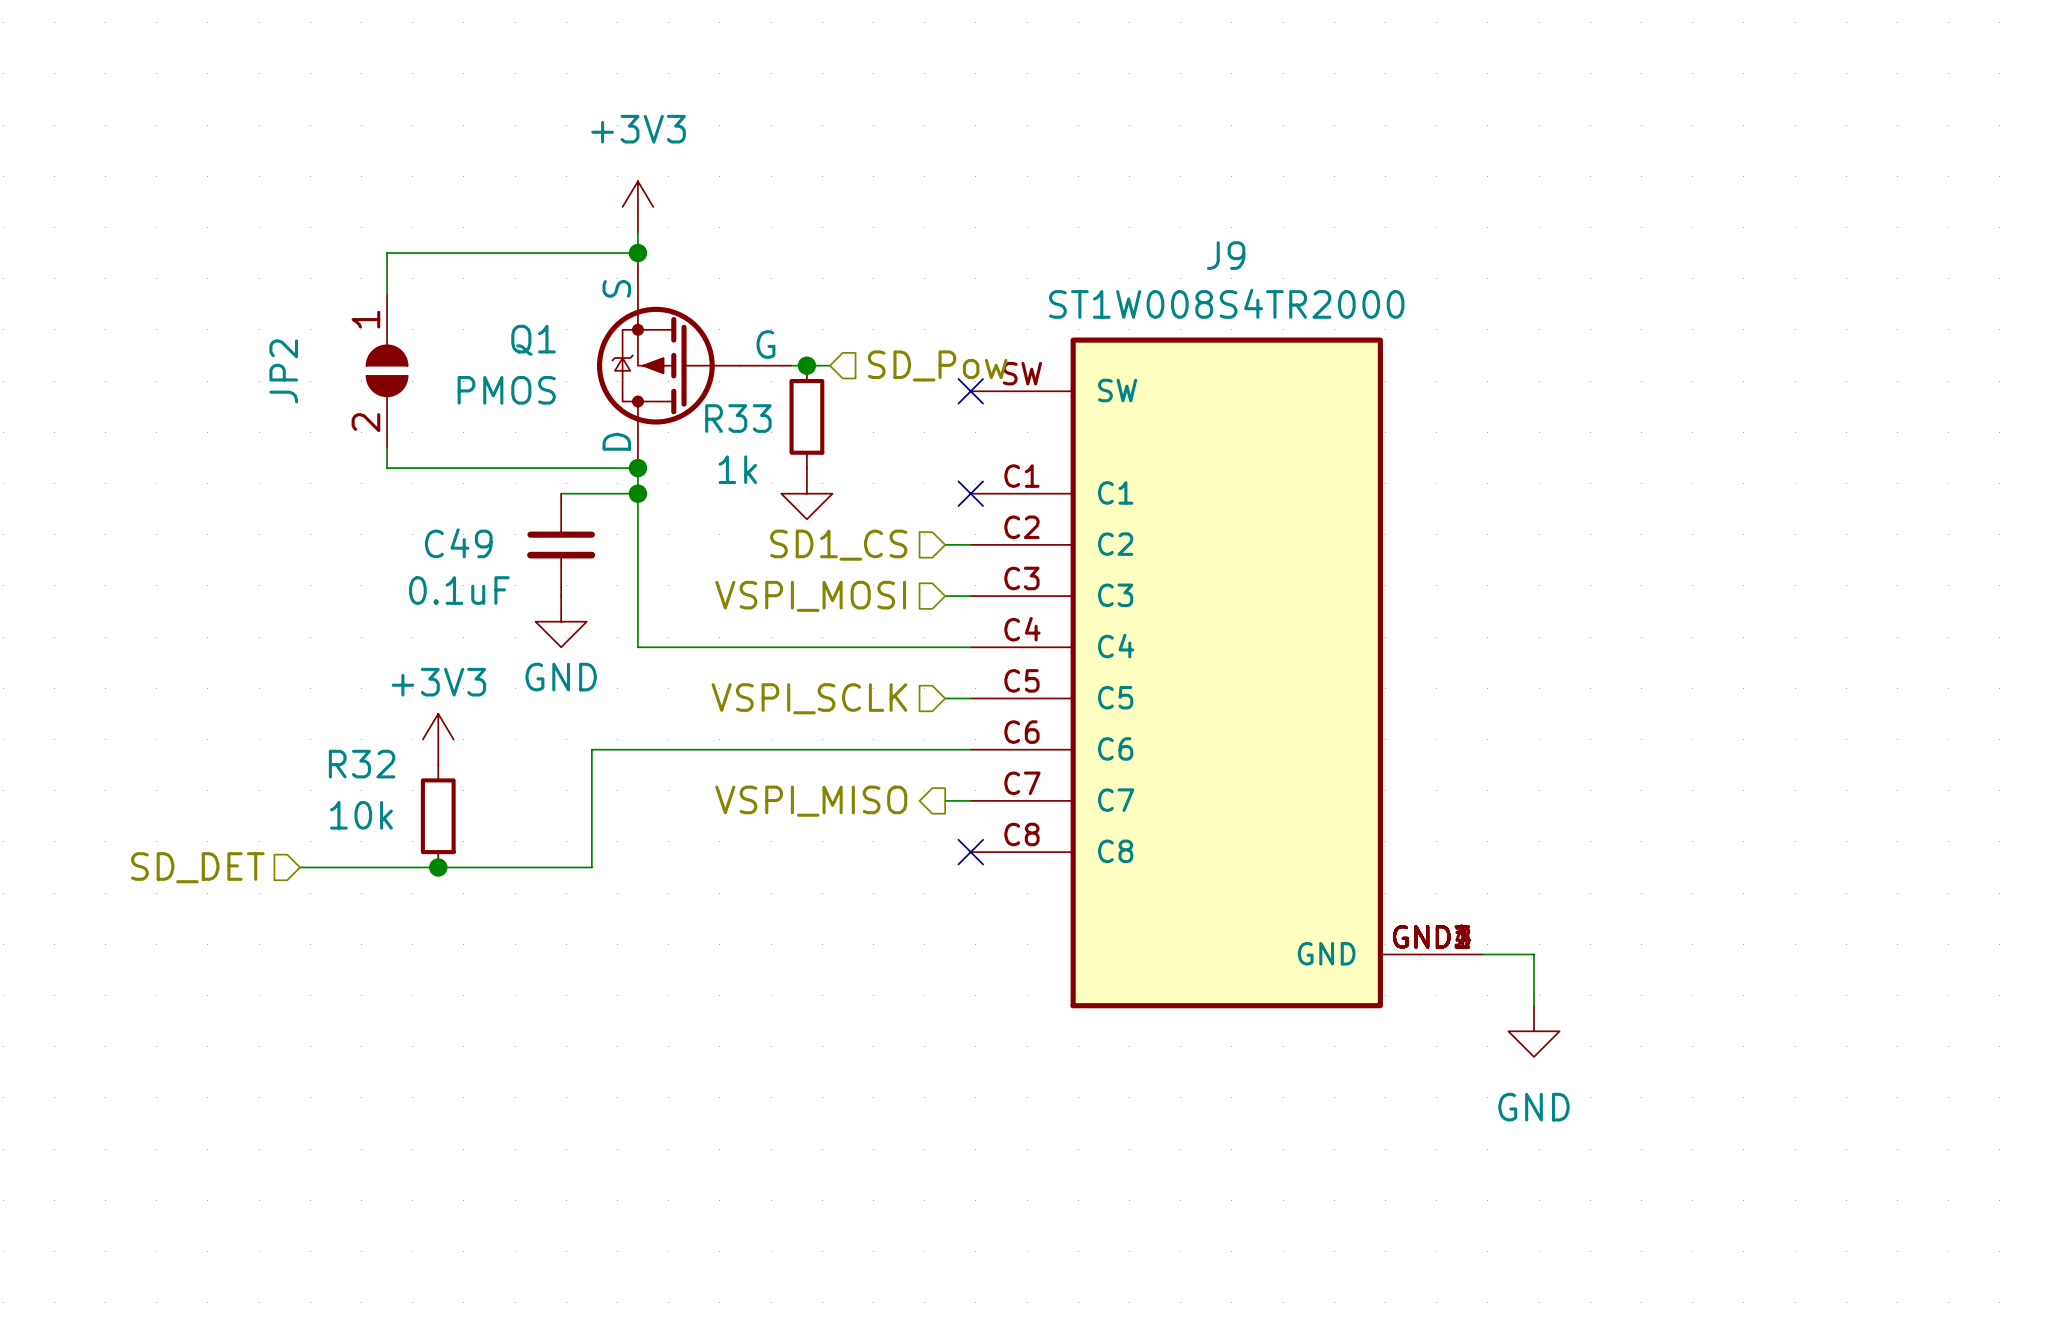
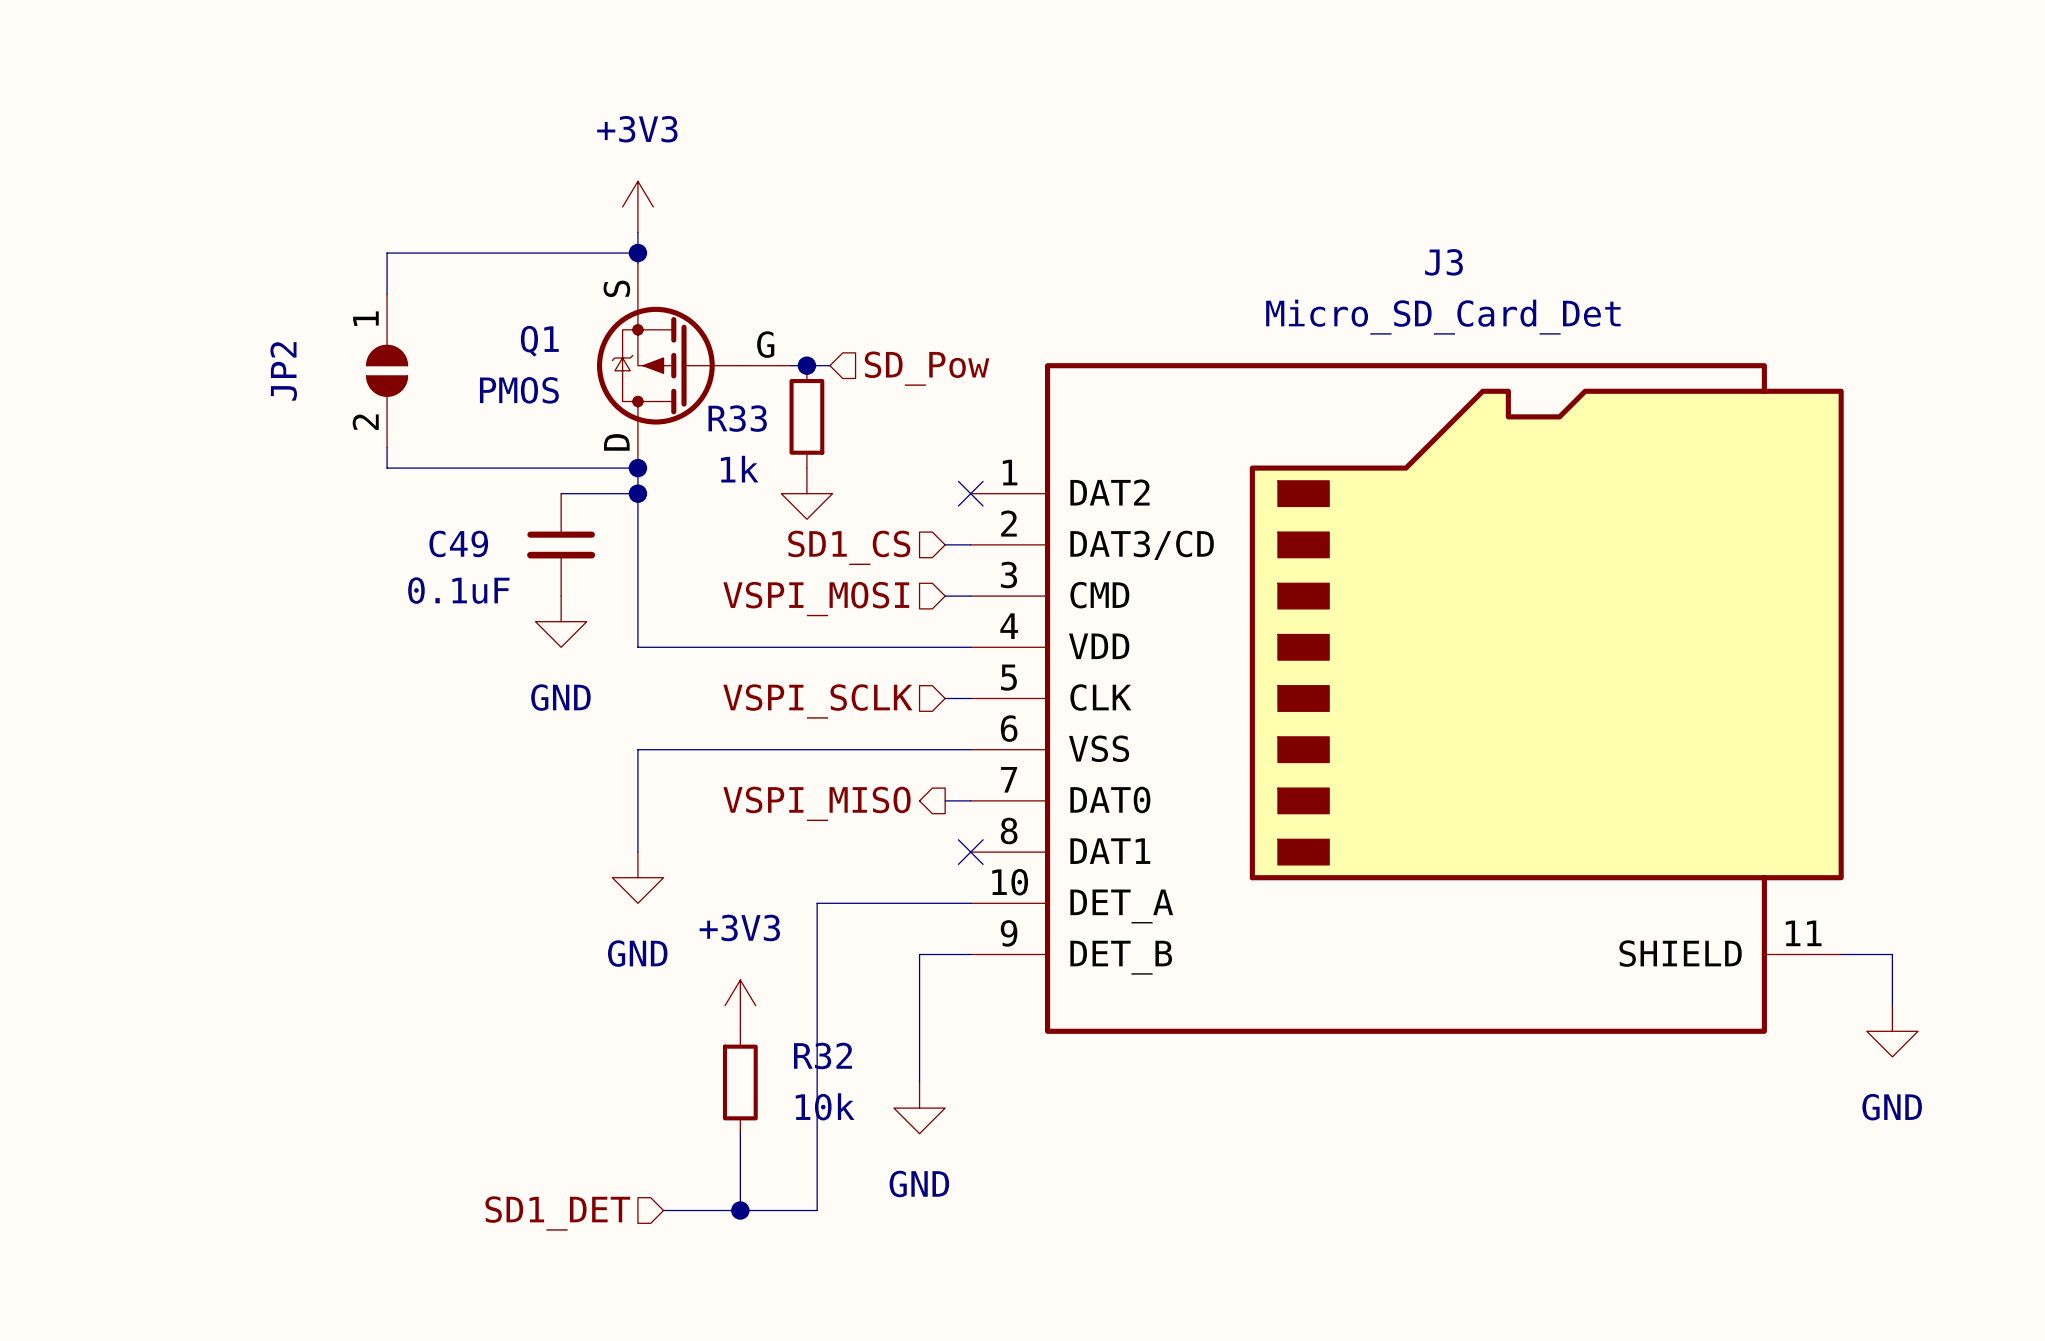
no-connect mark: (970, 391) -> none
J9: ST1W008S4TR2000 (1226, 672) -> none
power symbol text position: GND (561, 677) -> GND (560, 697)
power symbol text position: +3V3 (438, 682) -> +3V3 (739, 927)
J3: none -> Micro_SD_Card_Det (1407, 698)
power symbol position: +3V3 (438, 739) -> +3V3 (740, 1005)
wire: (637, 749) (591, 749) (591, 867) (300, 867) -> (637, 749) (637, 852)
R32 name position: R32 (362, 764) -> R32 (822, 1055)
R32 value position: 10k (361, 815) -> 10k (825, 1106)
R32 position: (438, 816) -> (740, 1082)
hierarchical label: SD_DET (197, 867) -> none
junction: (438, 867) -> none
power symbol: none -> GND (637, 877)
wire: none -> (970, 903) (817, 903) (817, 1210) (663, 1210)
wire: none -> (970, 954) (919, 954) (919, 1082)
wire: (1482, 954) (1533, 954) (1533, 1005) -> (1841, 954) (1892, 954) (1892, 1005)
power symbol: GND (1533, 1031) -> none
power symbol: none -> GND (1892, 1031)
power symbol: none -> GND (919, 1108)
wire: none -> (740, 1133) (740, 1210)
hierarchical label: none -> SD1_DET (557, 1213)
junction: none -> (740, 1210)

